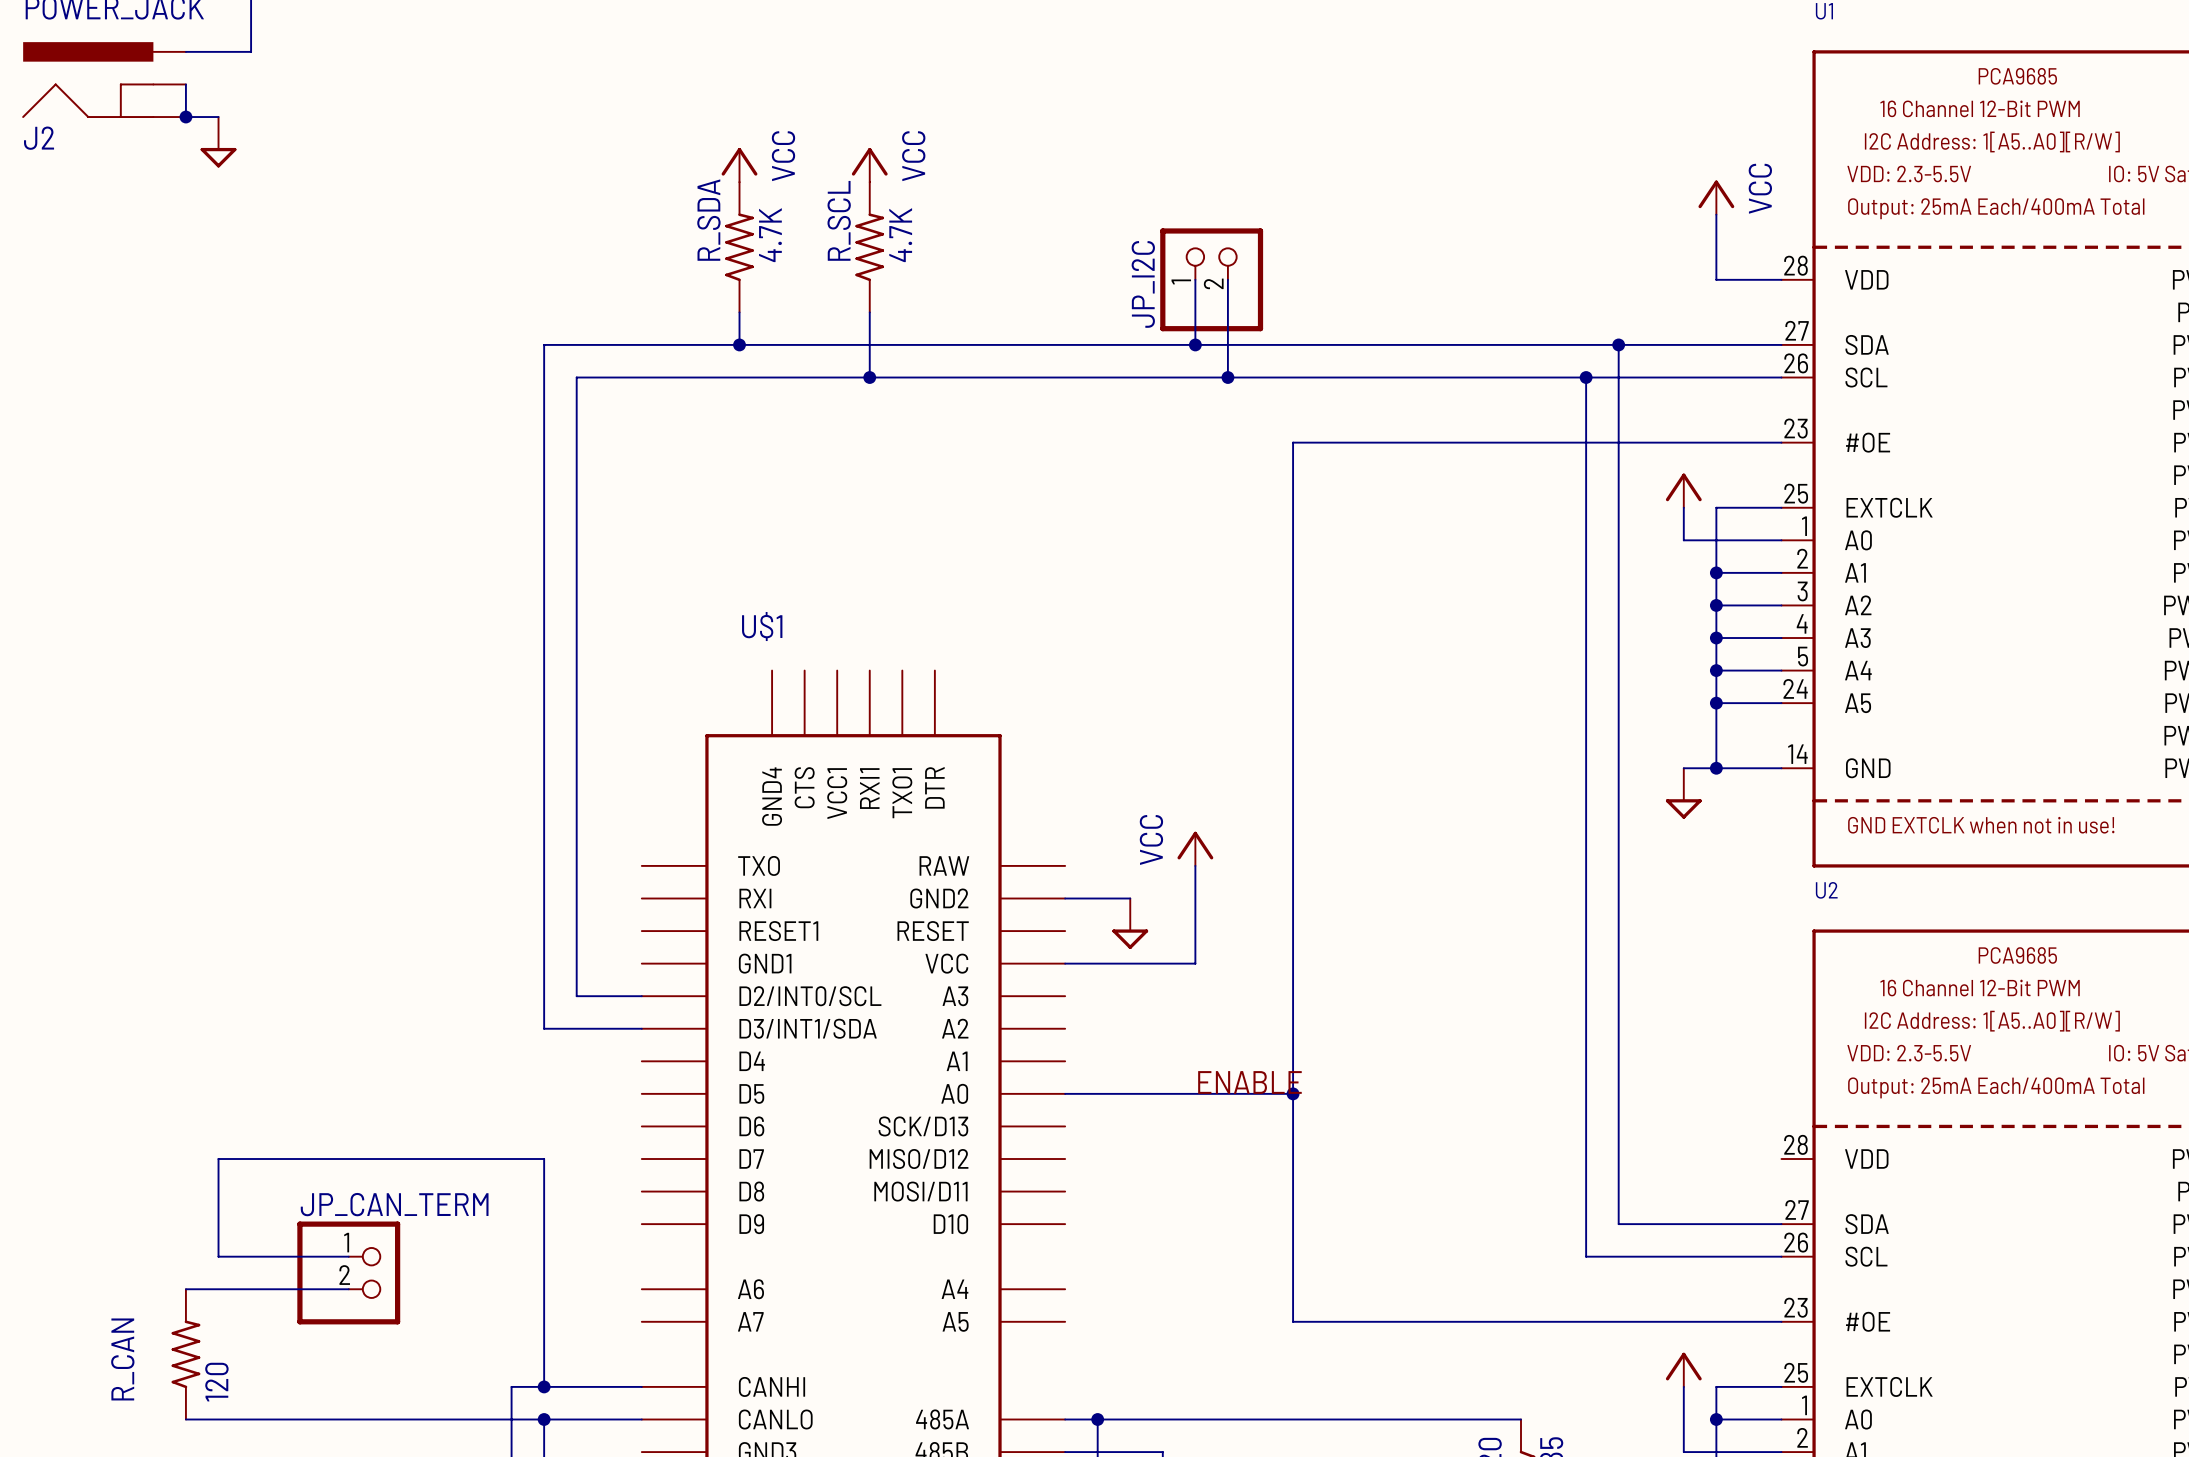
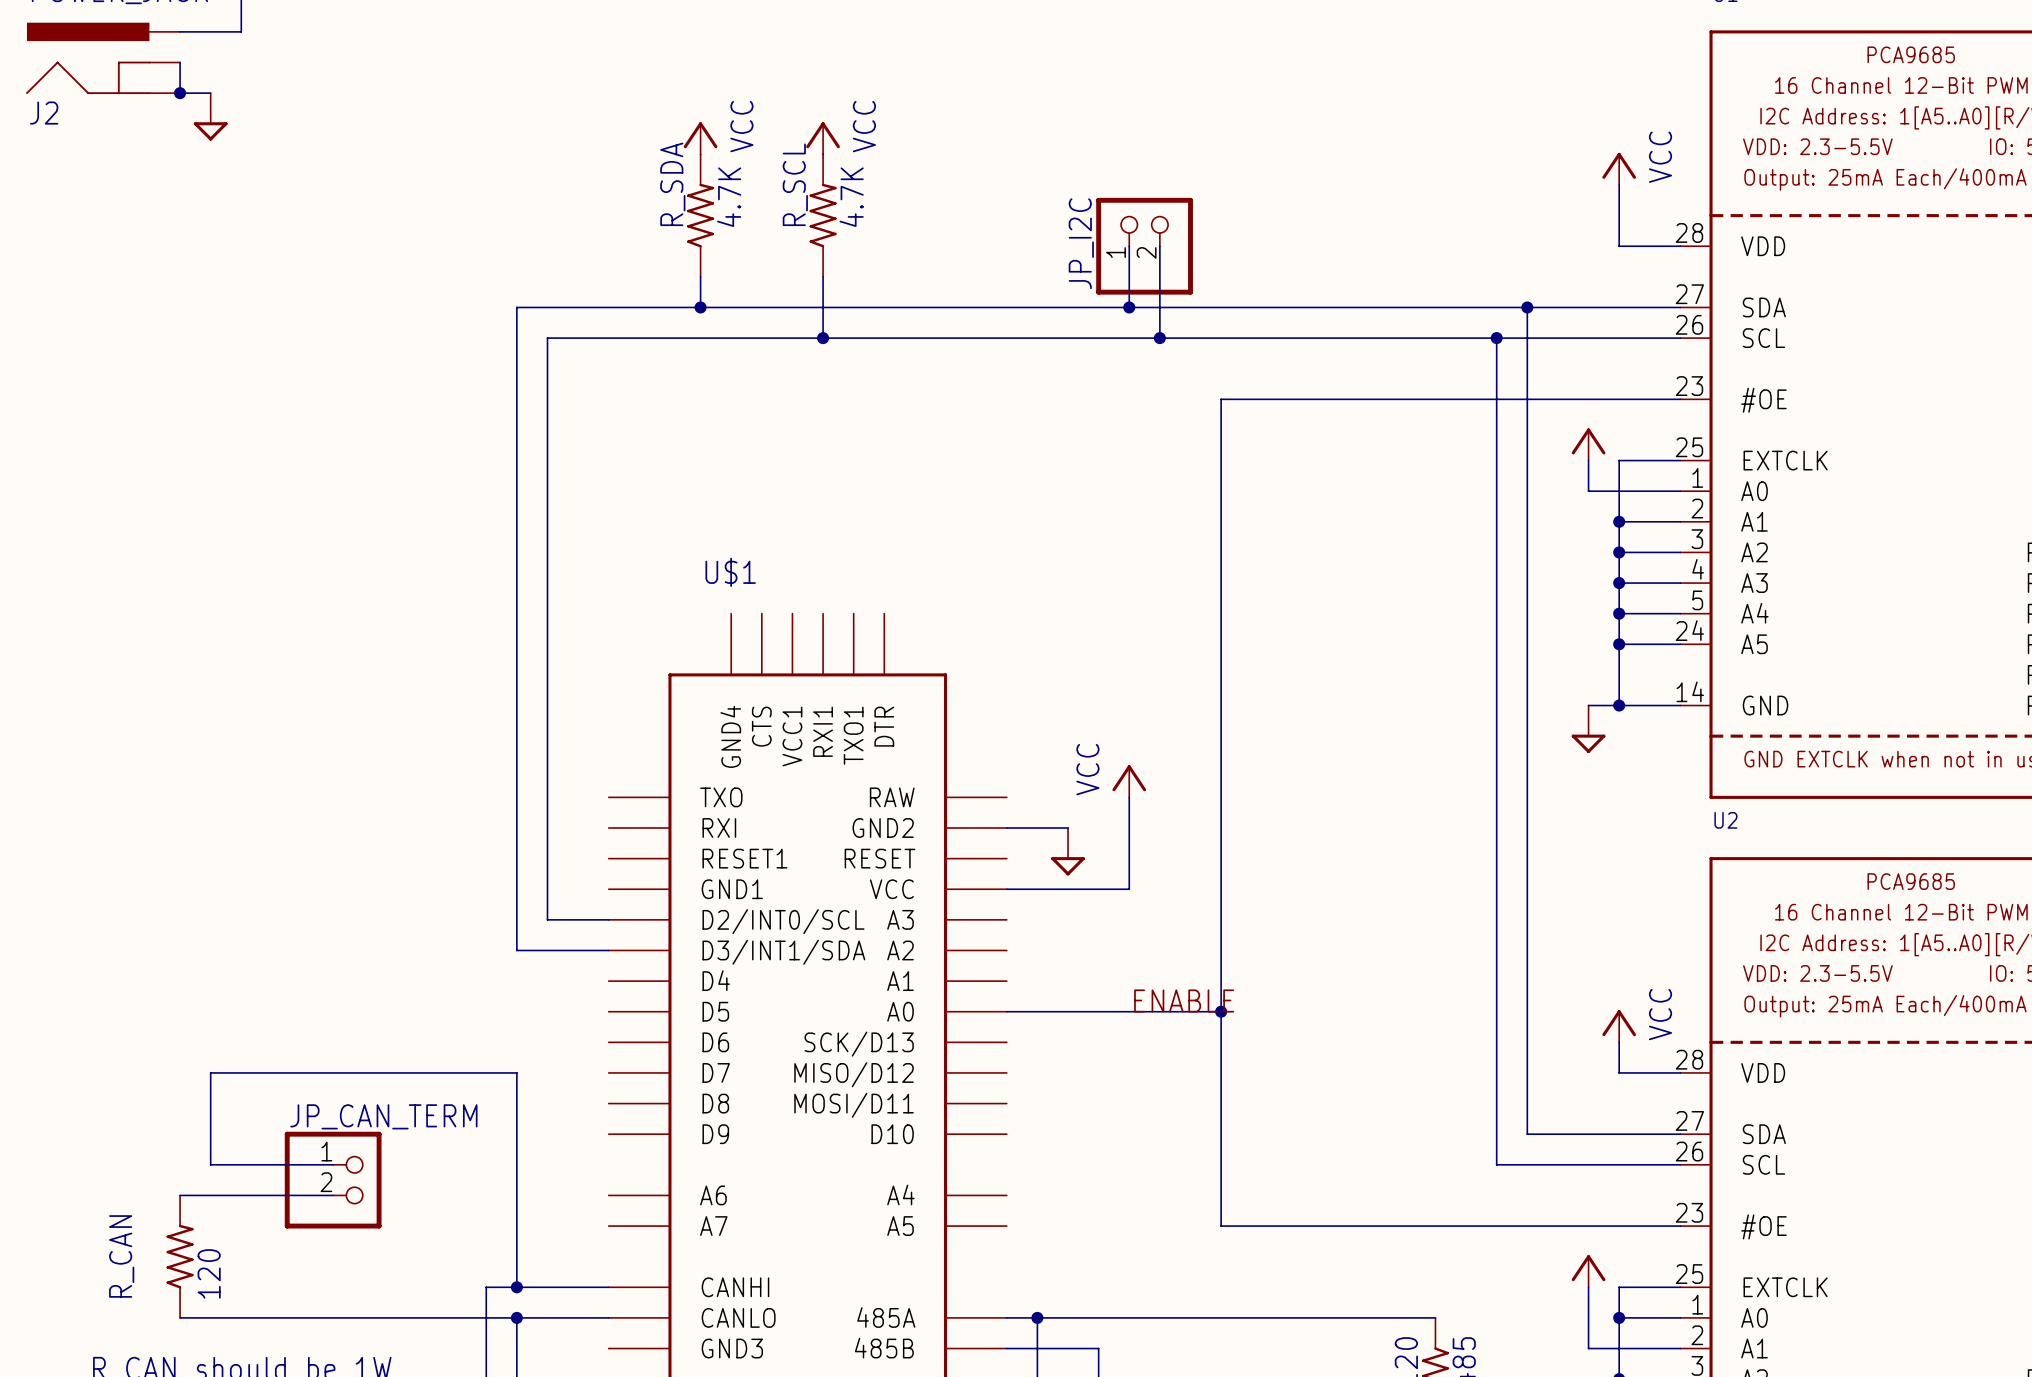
power symbol: none -> VCC (1619, 1026)
wire: none -> (1619, 1042) (1619, 1072) (1680, 1072)

